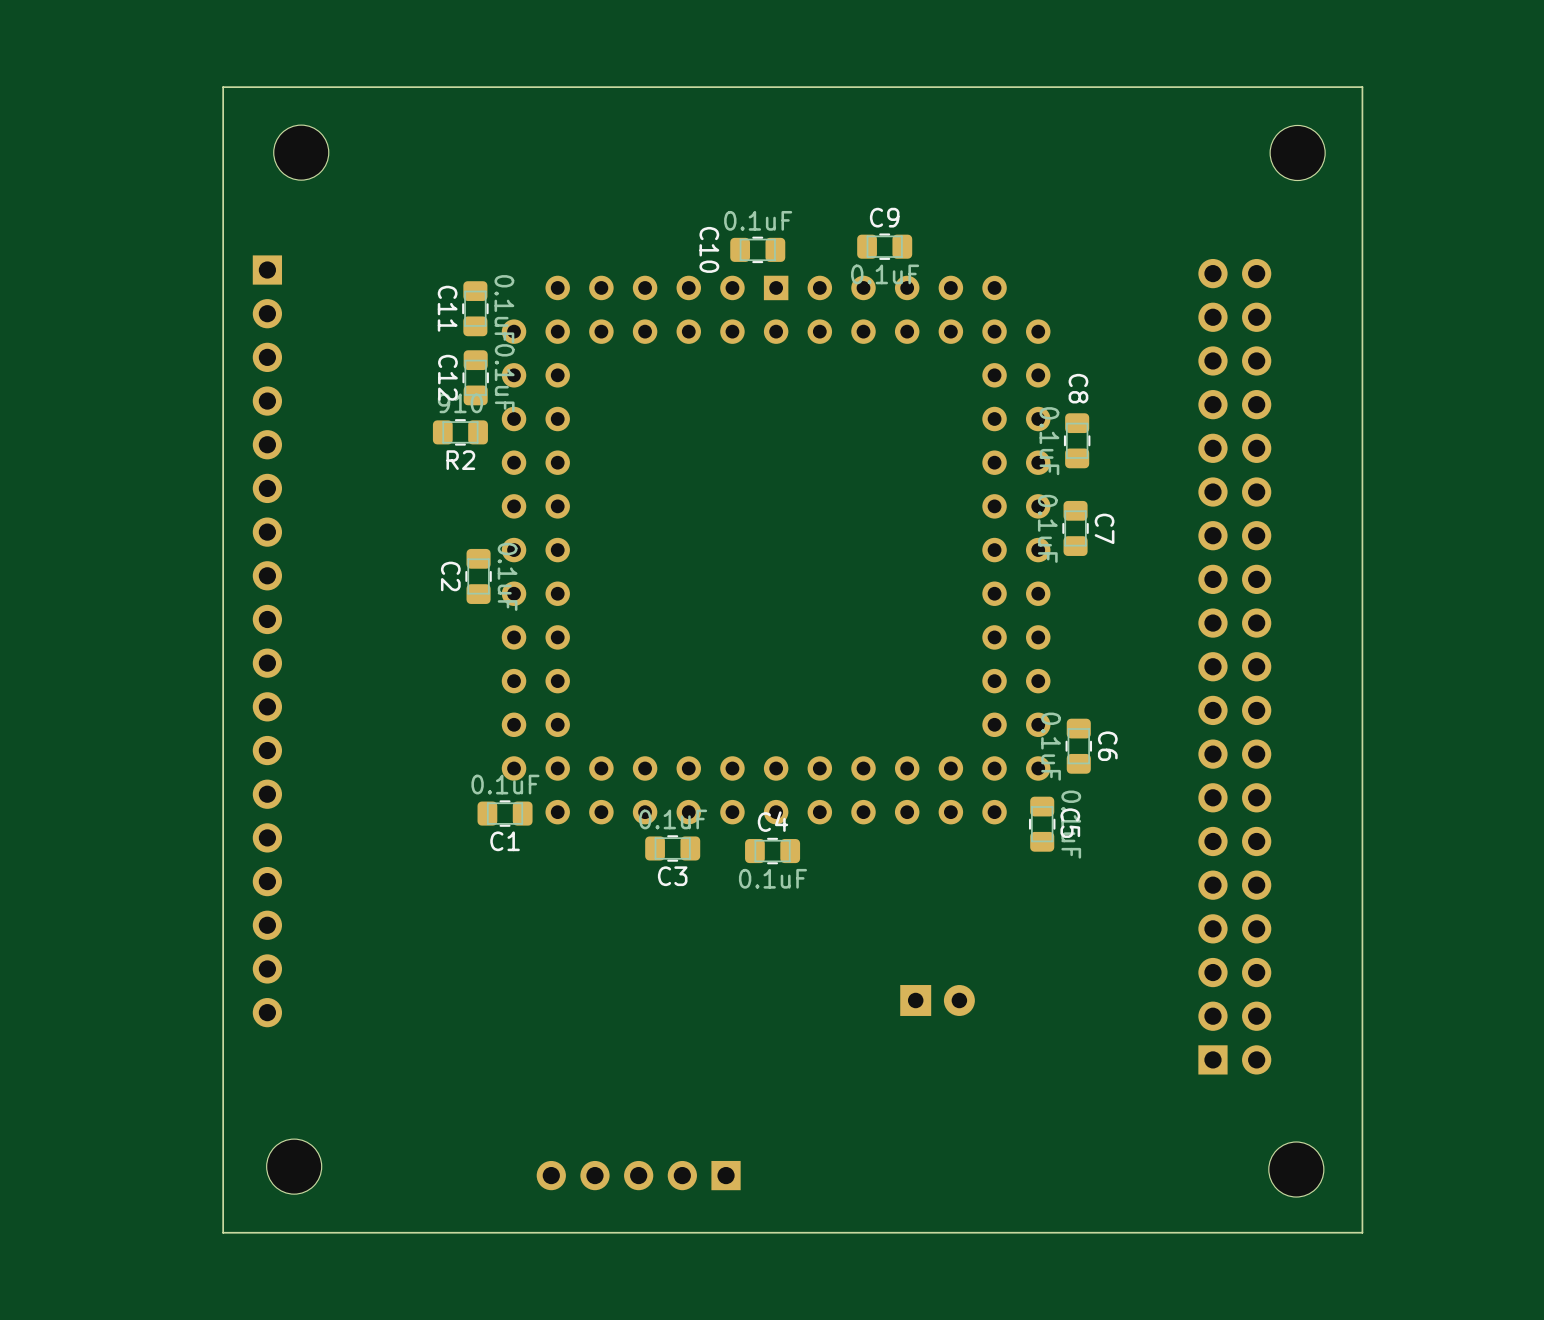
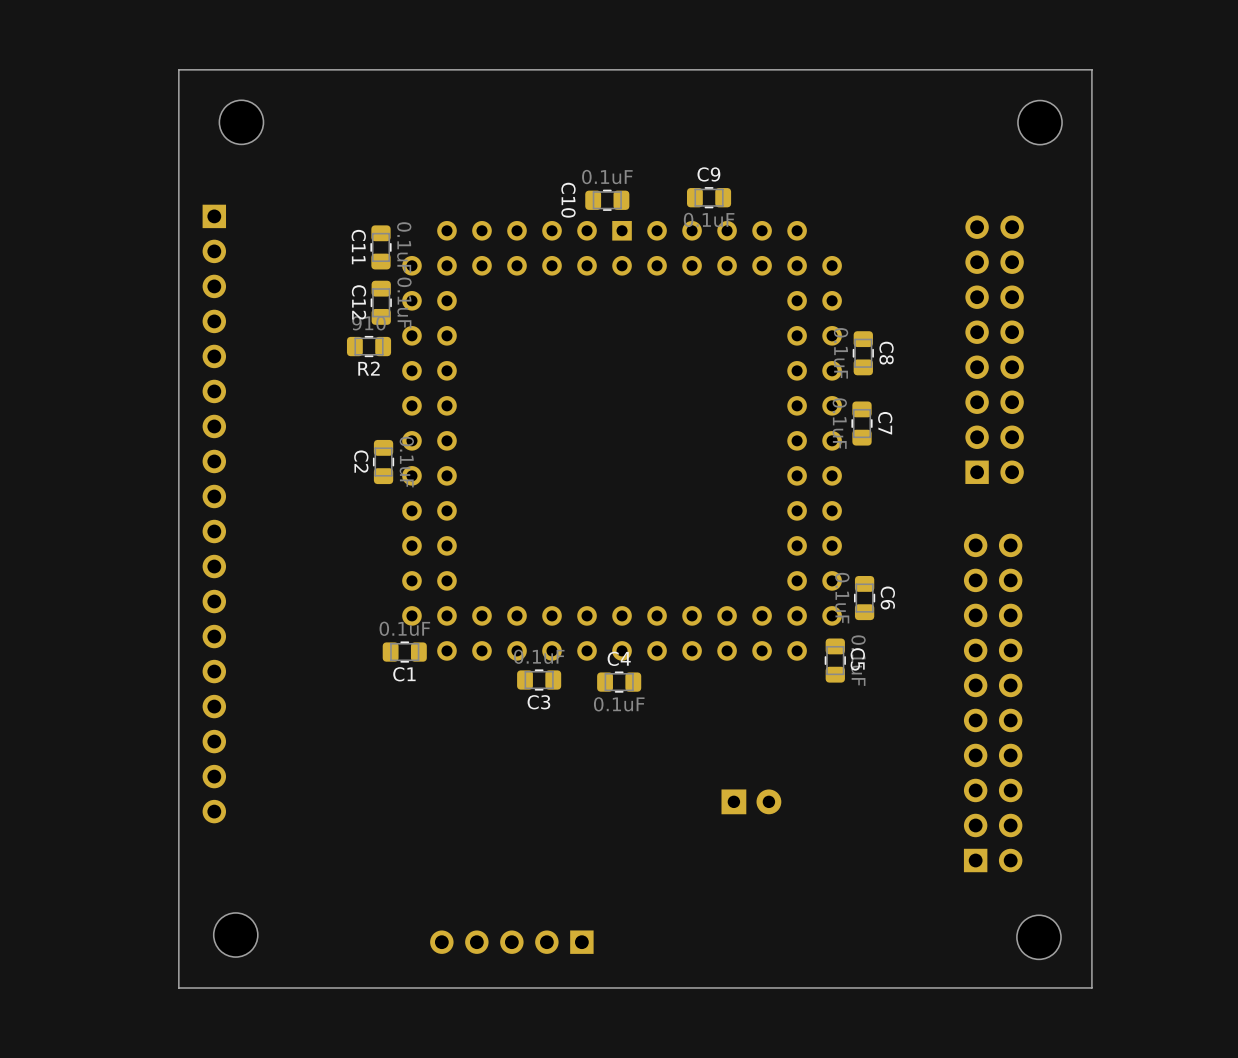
C8 name position: C8 (1078, 388) -> C8 (886, 353)
part: none -> (994, 349)
part: (1234, 666) -> none
part: none -> (993, 702)

